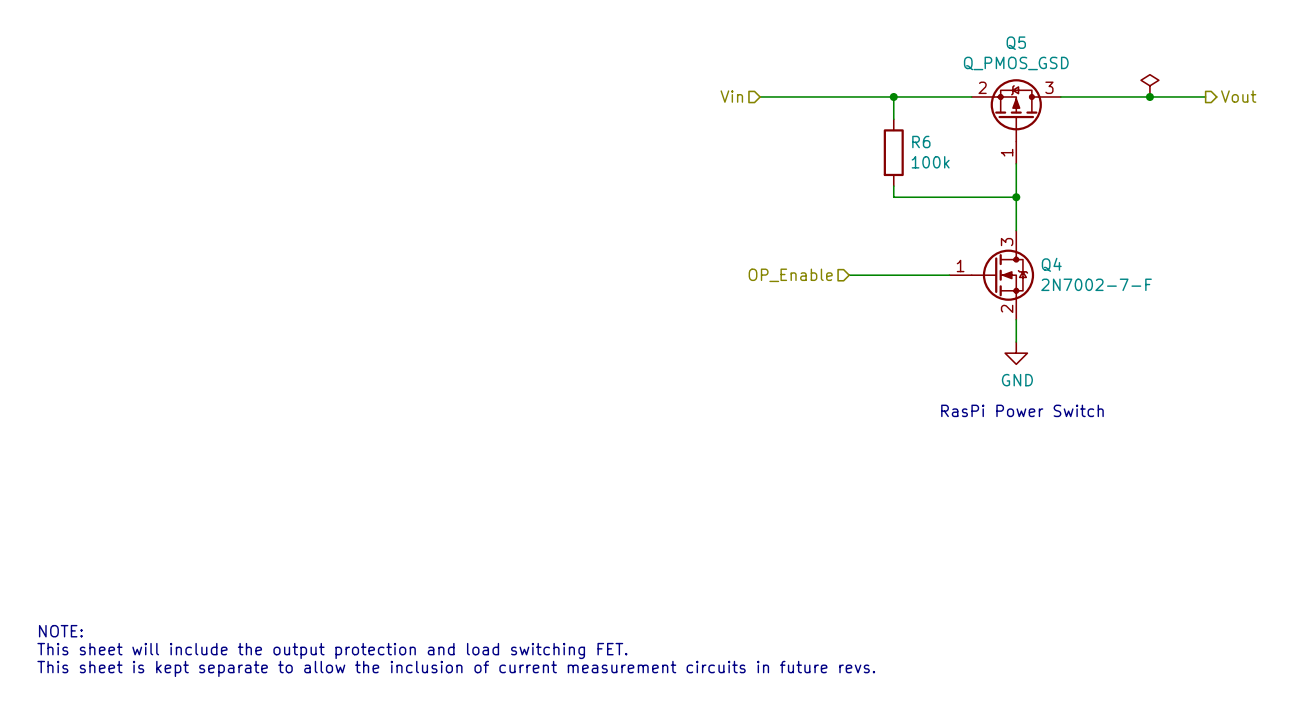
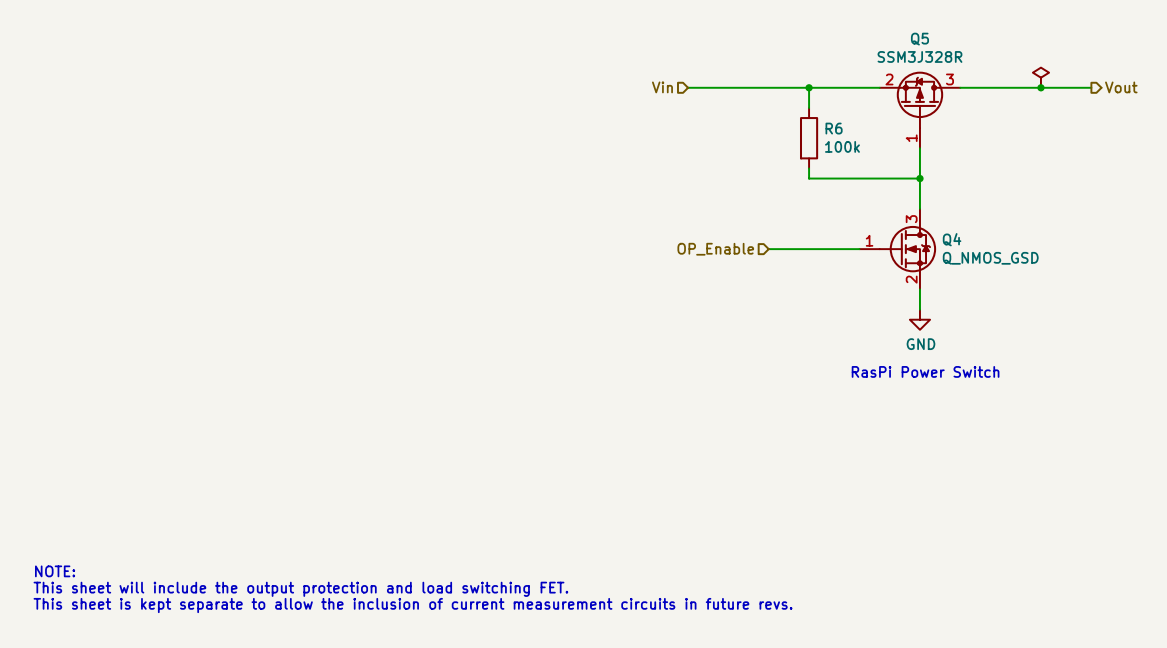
Q5 value: Q_PMOS_GSD (1016, 63) -> SSM3J328R (919, 56)
Q4 value: 2N7002-7-F (1096, 284) -> Q_NMOS_GSD (990, 258)

